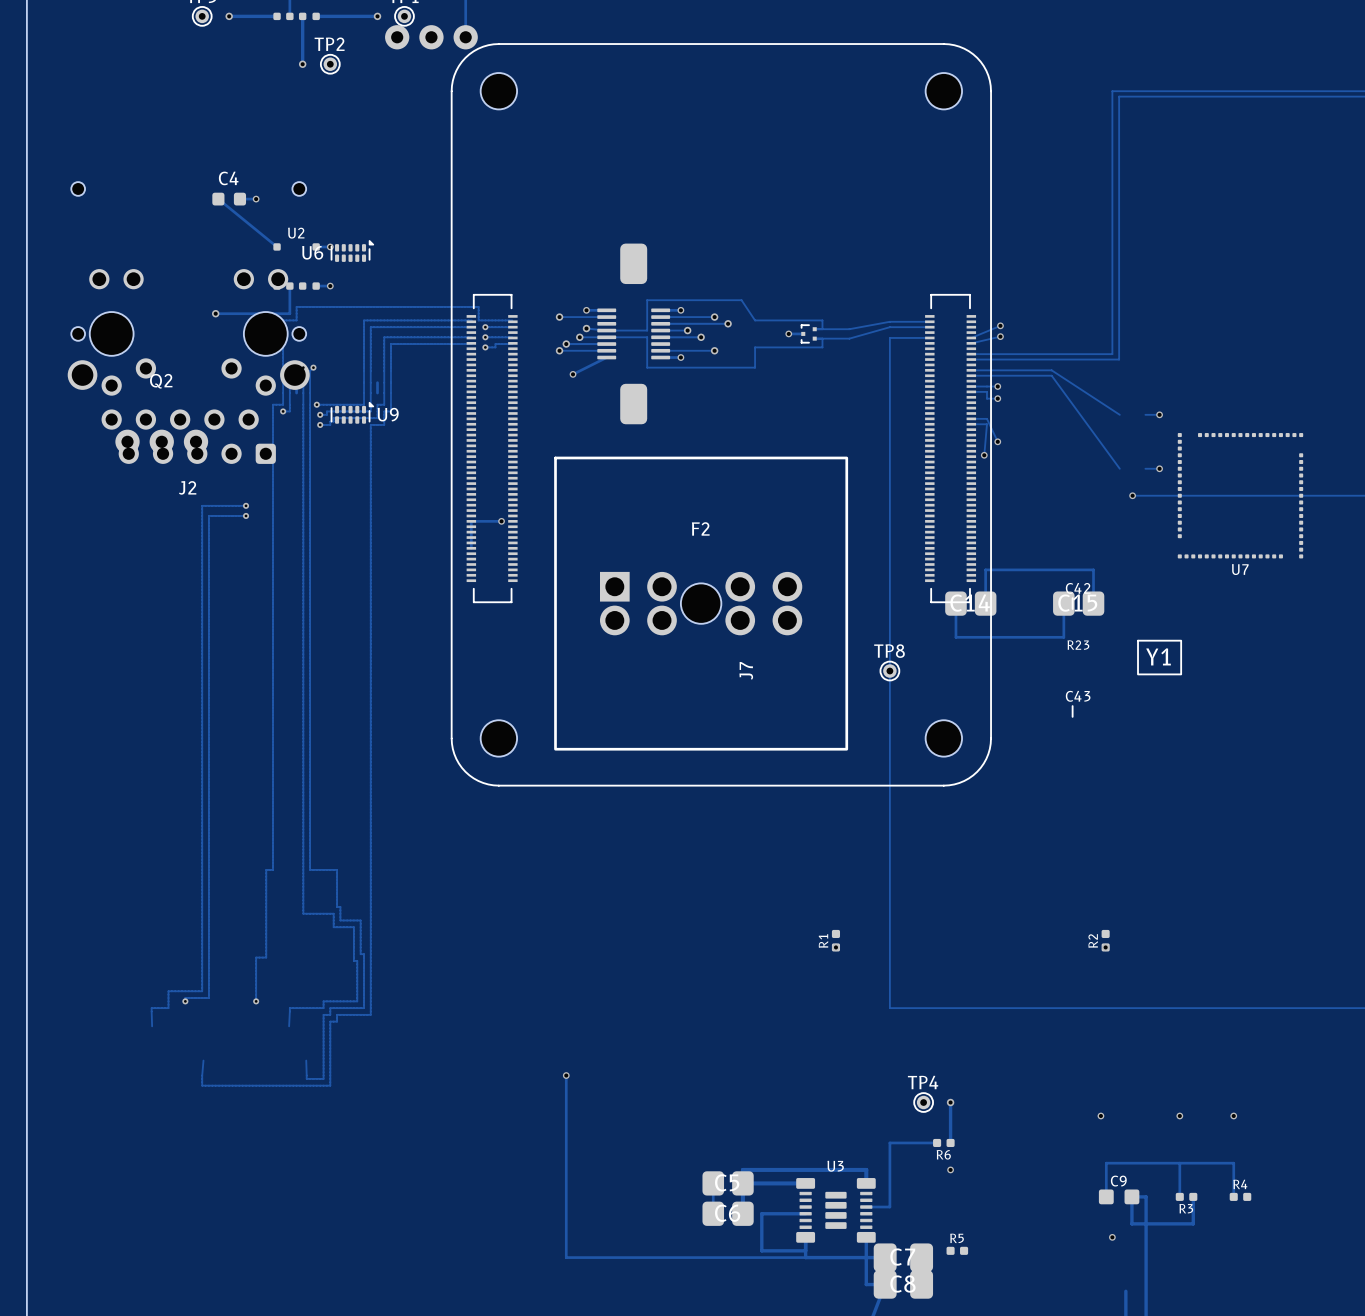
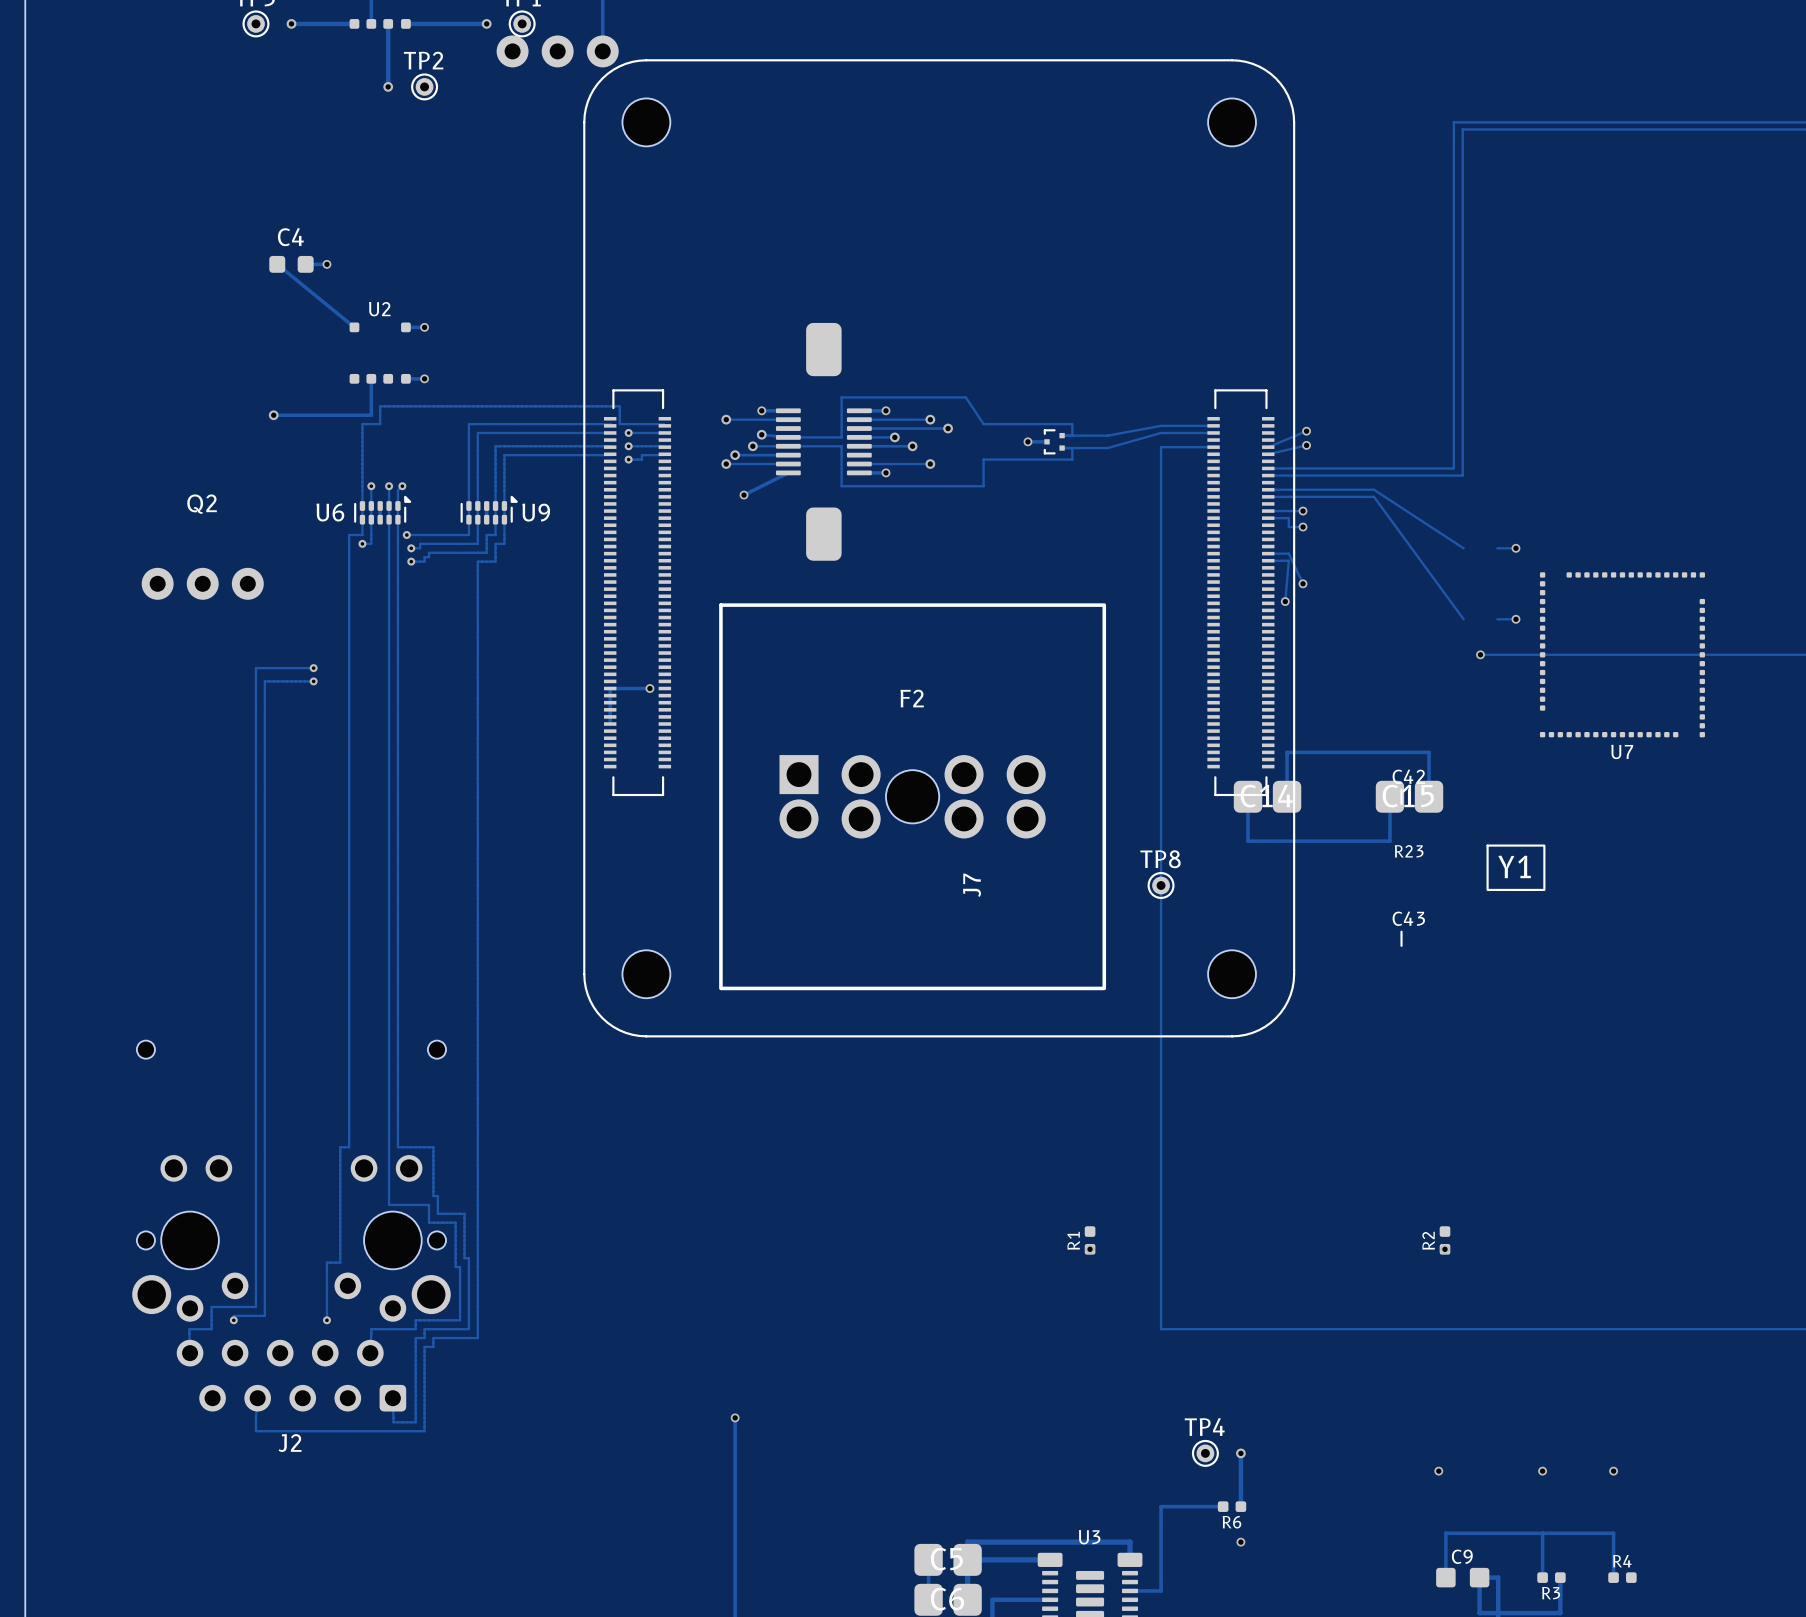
U6 position: (352, 250) -> (382, 510)
J2 position: (188, 323) -> (291, 1226)
U9 position: (352, 412) -> (489, 510)

